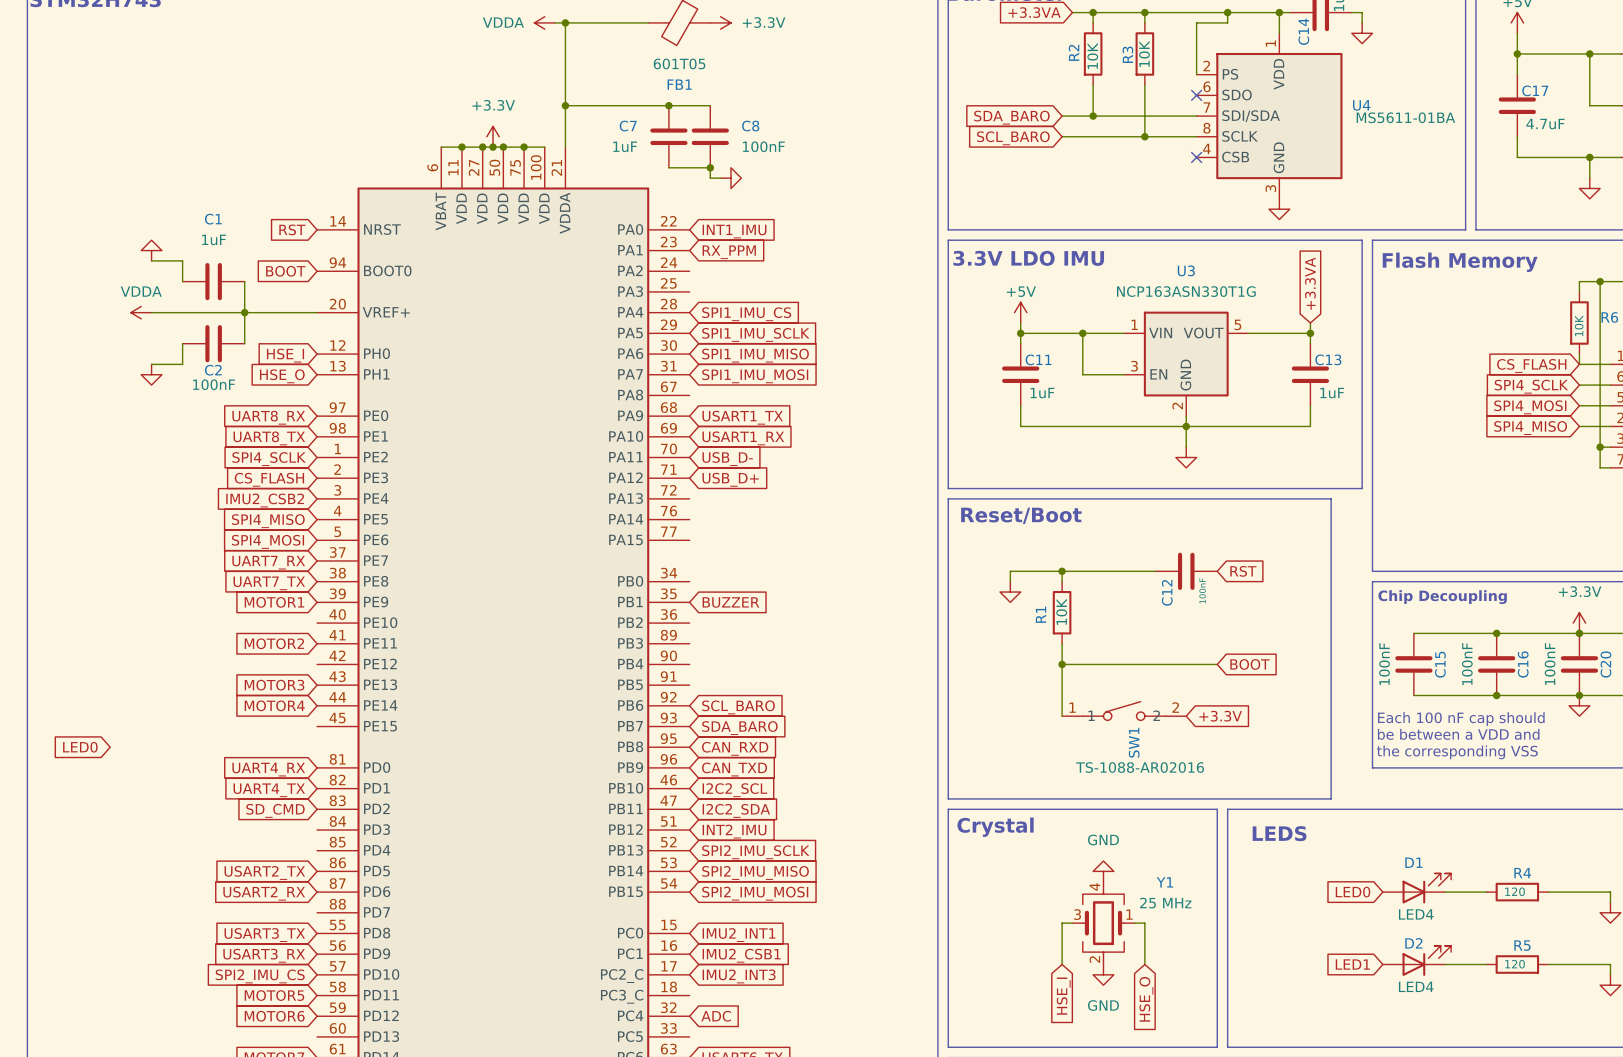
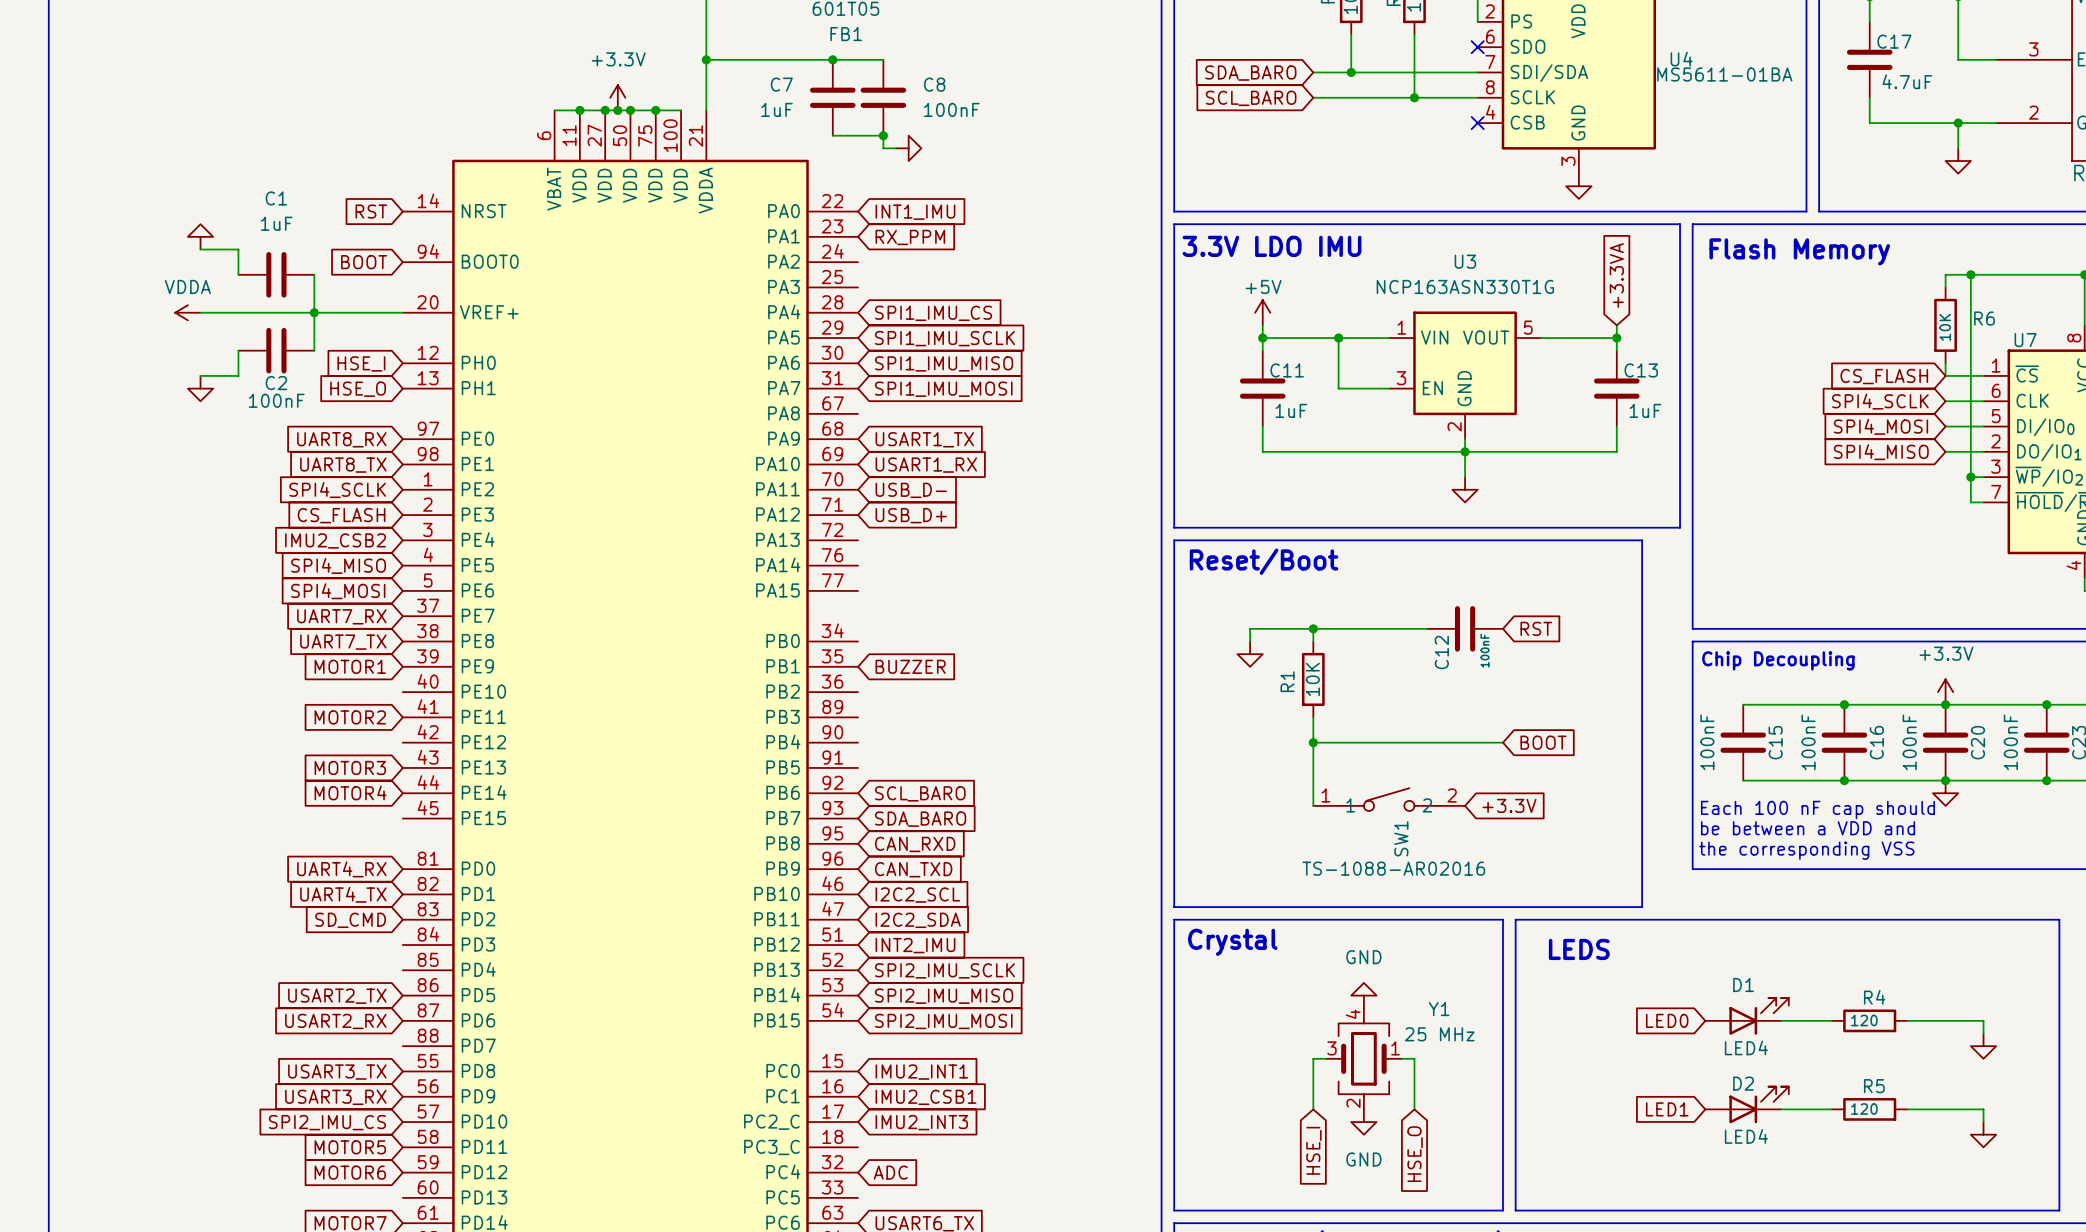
global label: LED0 (80, 747) -> none

